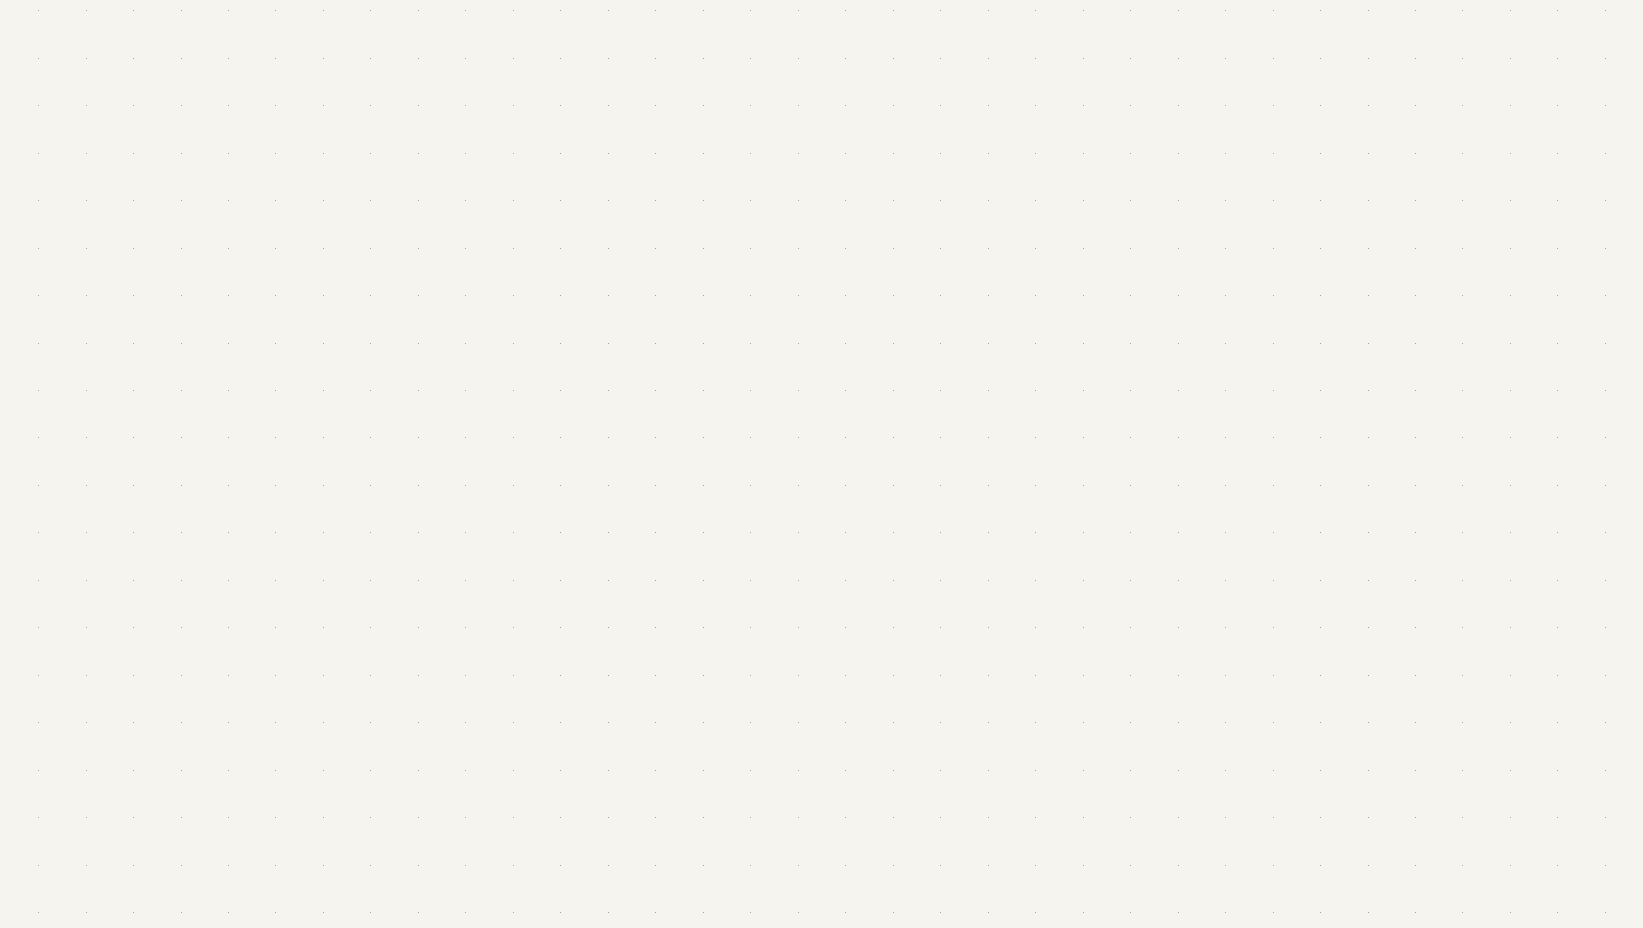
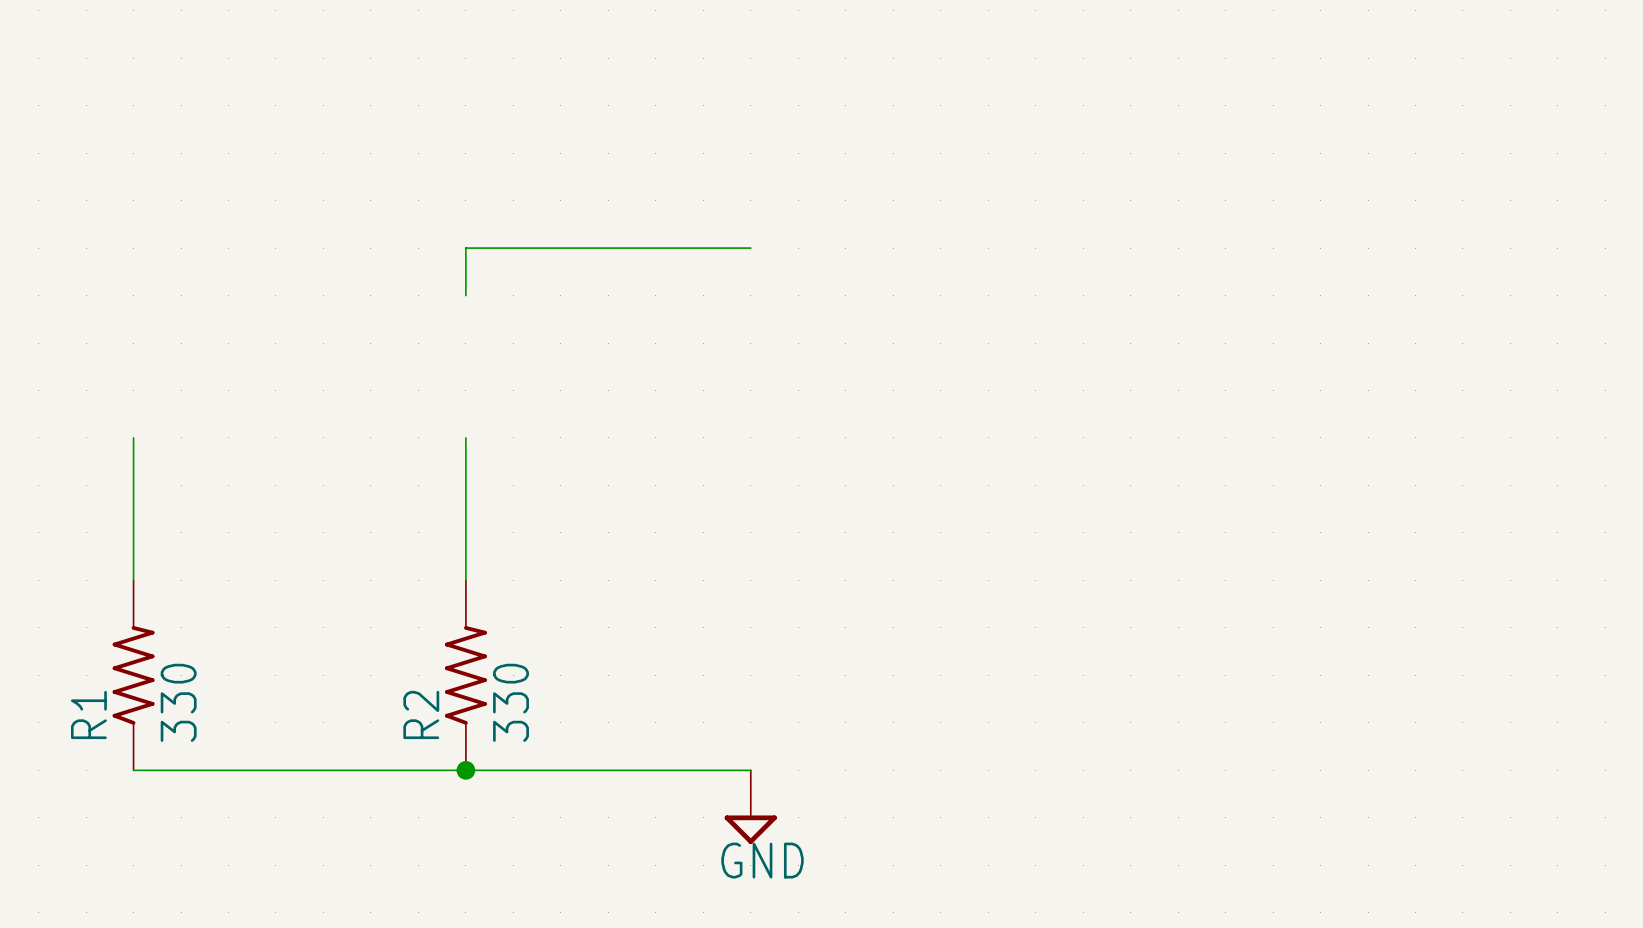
wire: none -> (750, 248) (465, 248) (465, 295)
wire: none -> (133, 437) (133, 580)
wire: none -> (465, 437) (465, 580)
R1: none -> 330 (133, 675)
R2: none -> 330 (465, 675)
wire: none -> (133, 770) (750, 770)
junction: none -> (465, 770)
power symbol: none -> GND (750, 807)

